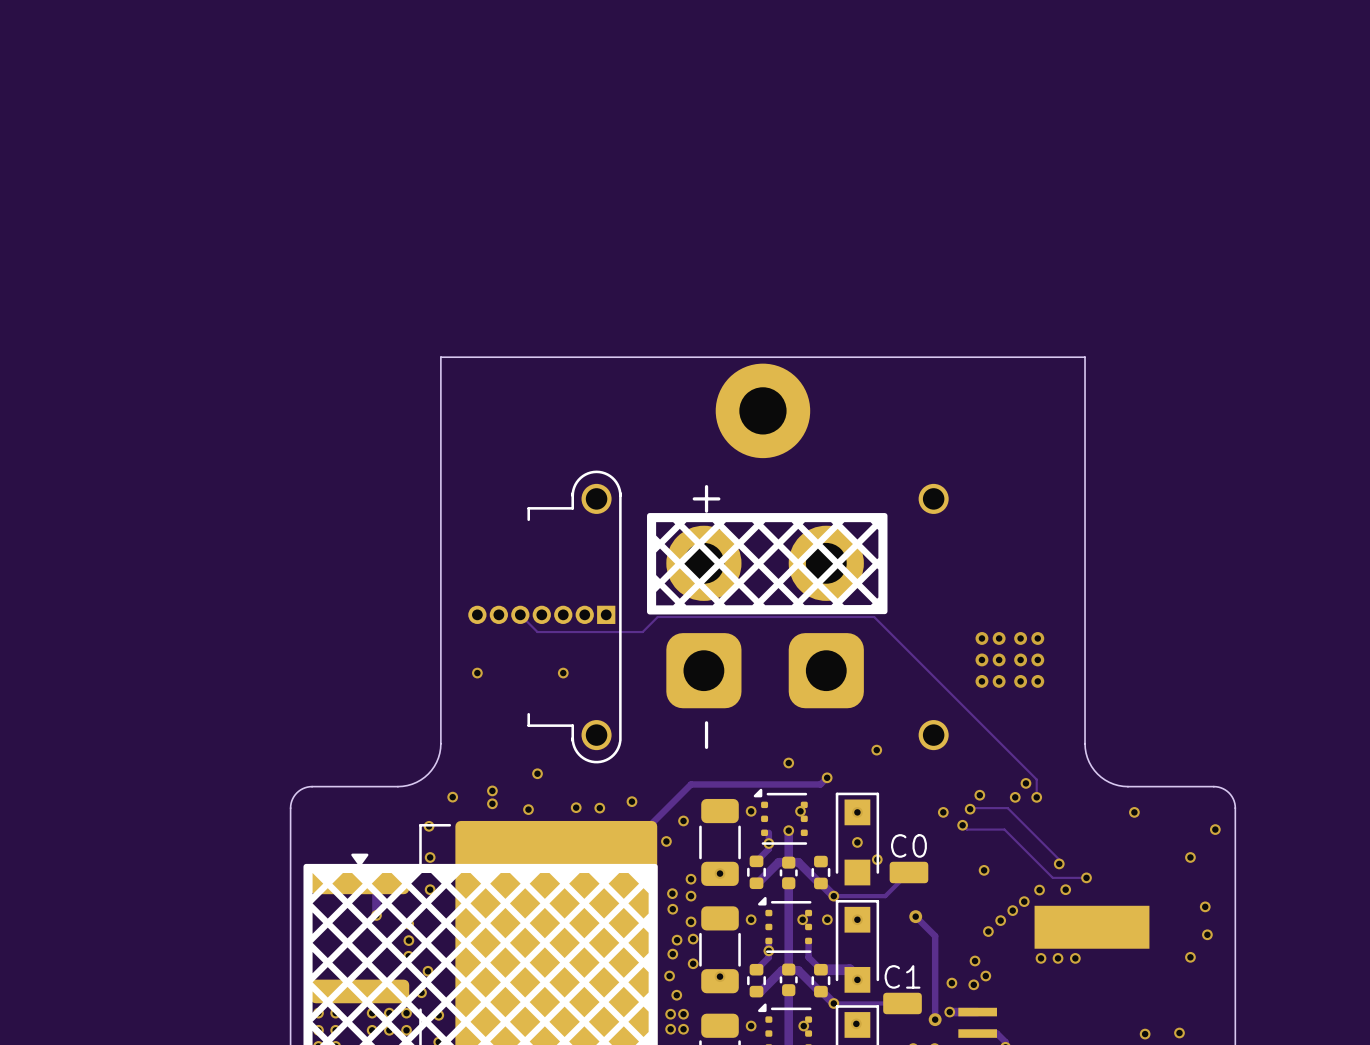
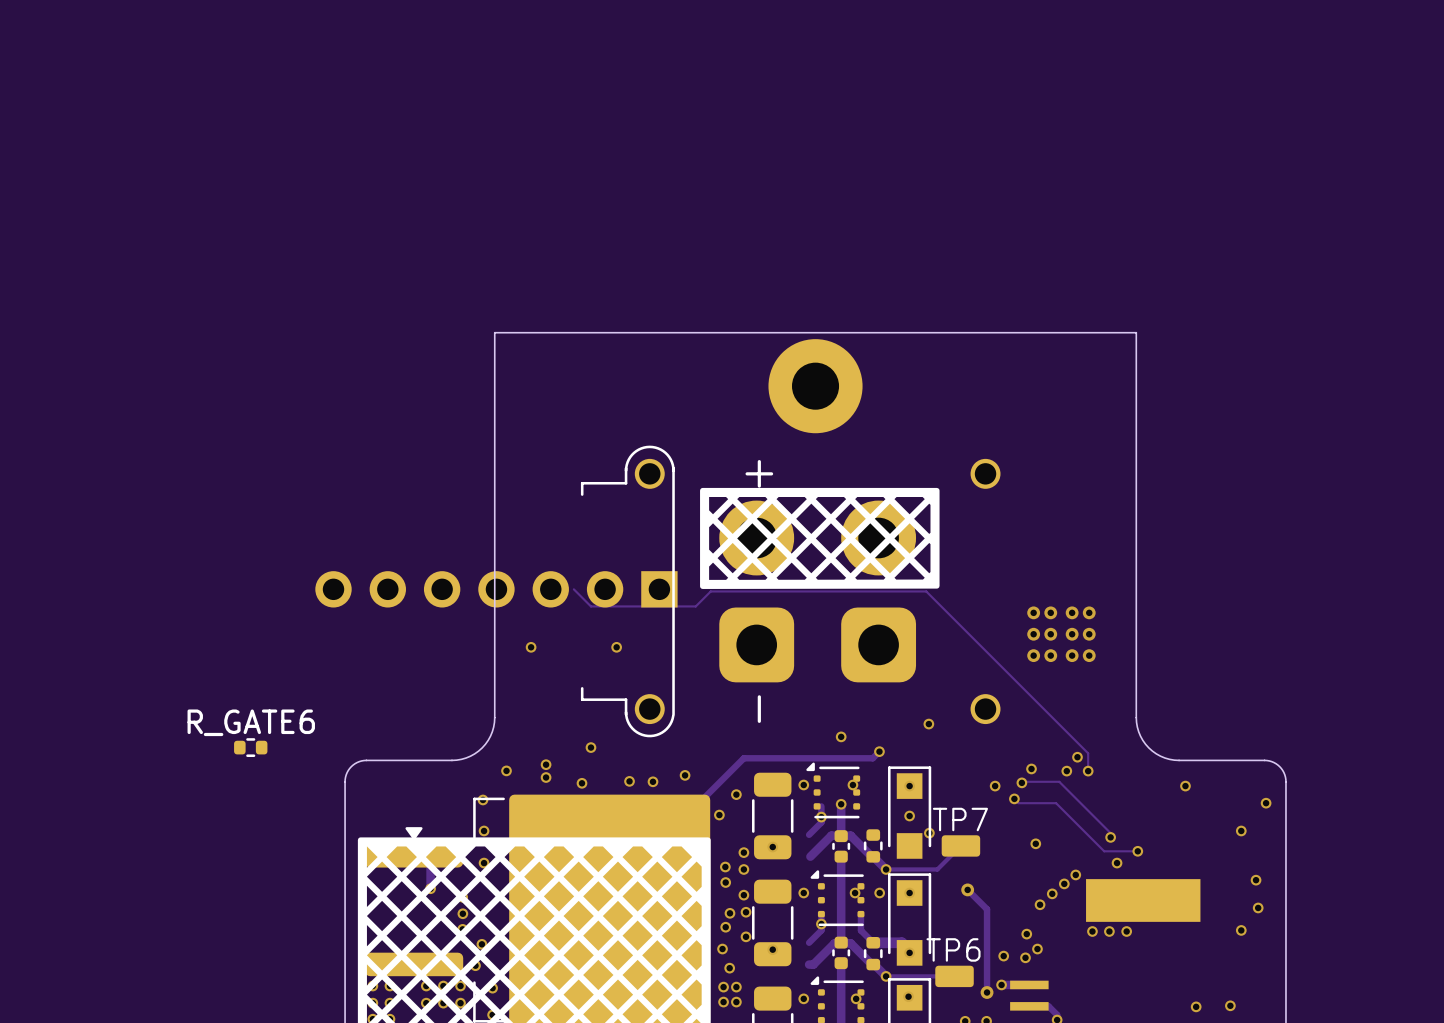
part: none -> (496, 589)
part: (541, 614) -> none
R_GATE6: none -> (250, 747)
C0 name: C0 (908, 845) -> TP7 (960, 819)
part: (756, 872) -> none
via: (1039, 890) -> none
C1 name: C1 (902, 976) -> TP6 (953, 949)
part: (756, 980) -> none

